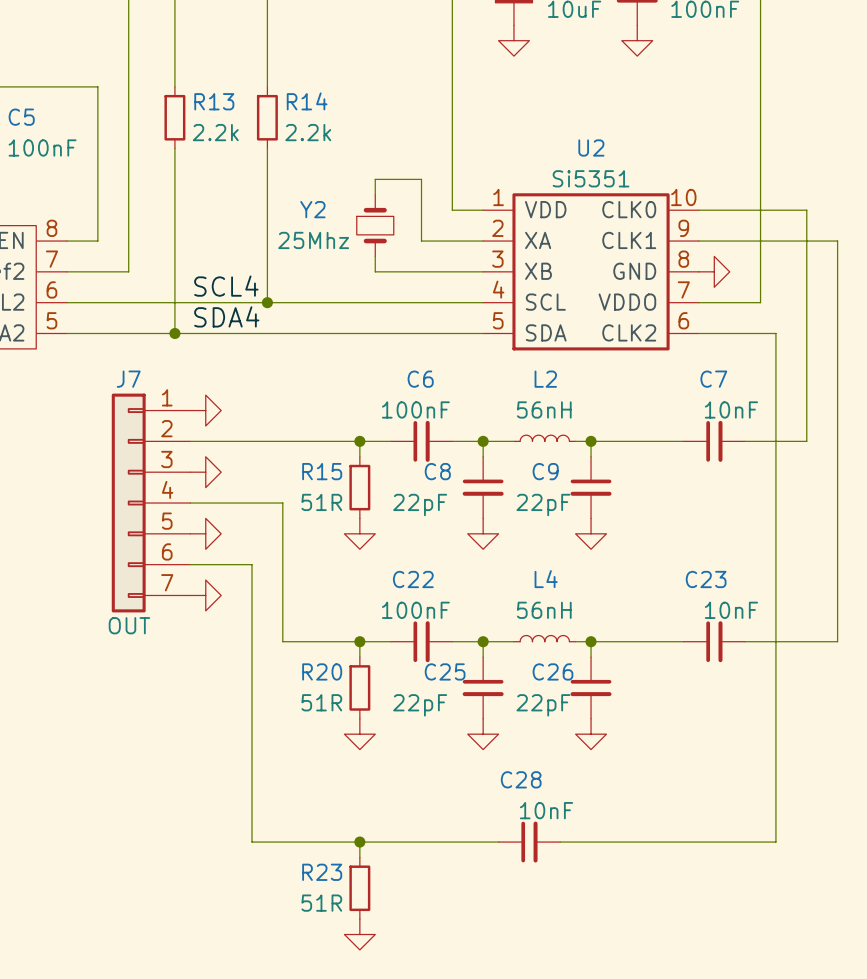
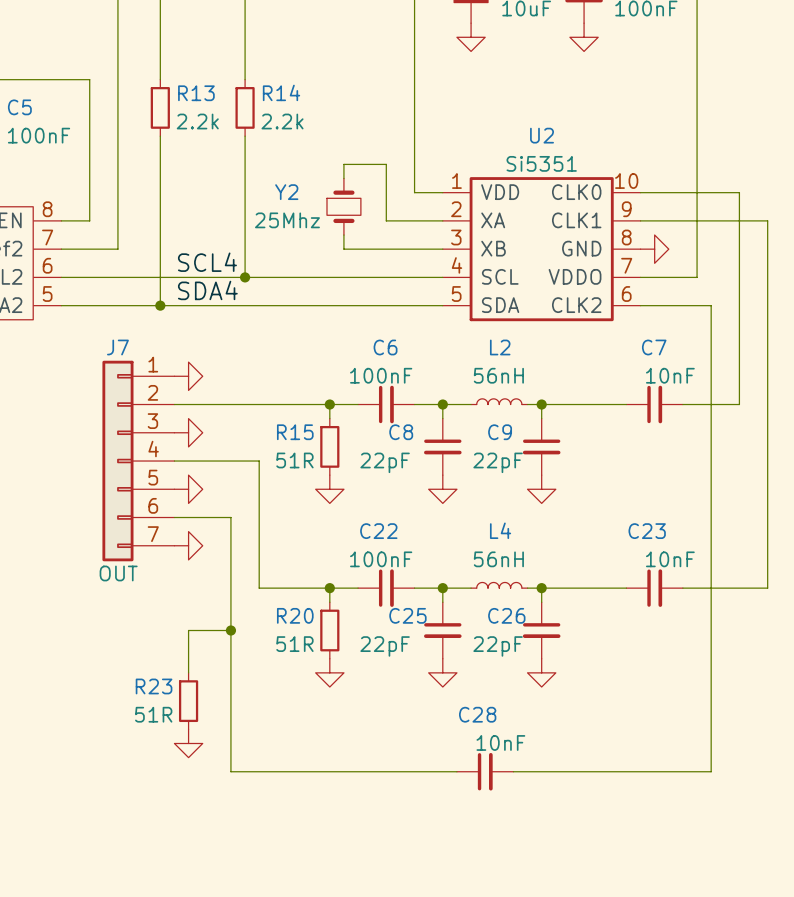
wire: none -> (230, 630) (188, 630) (188, 672)
junction: none -> (230, 630)
wire: (359, 842) (359, 857) -> none
junction: (359, 842) -> none
R23 position: (359, 888) -> (188, 701)
power symbol position: (359, 934) -> (188, 743)

